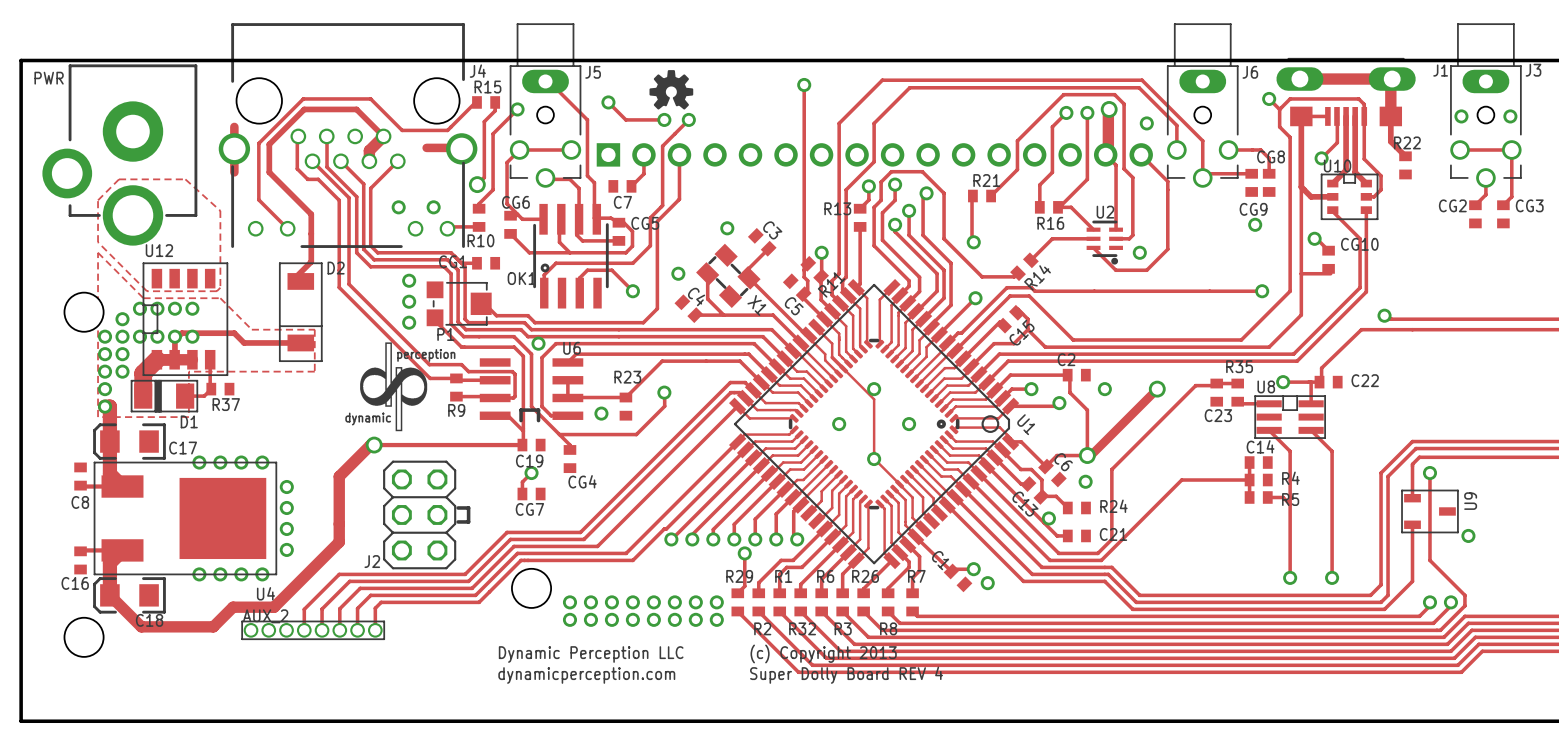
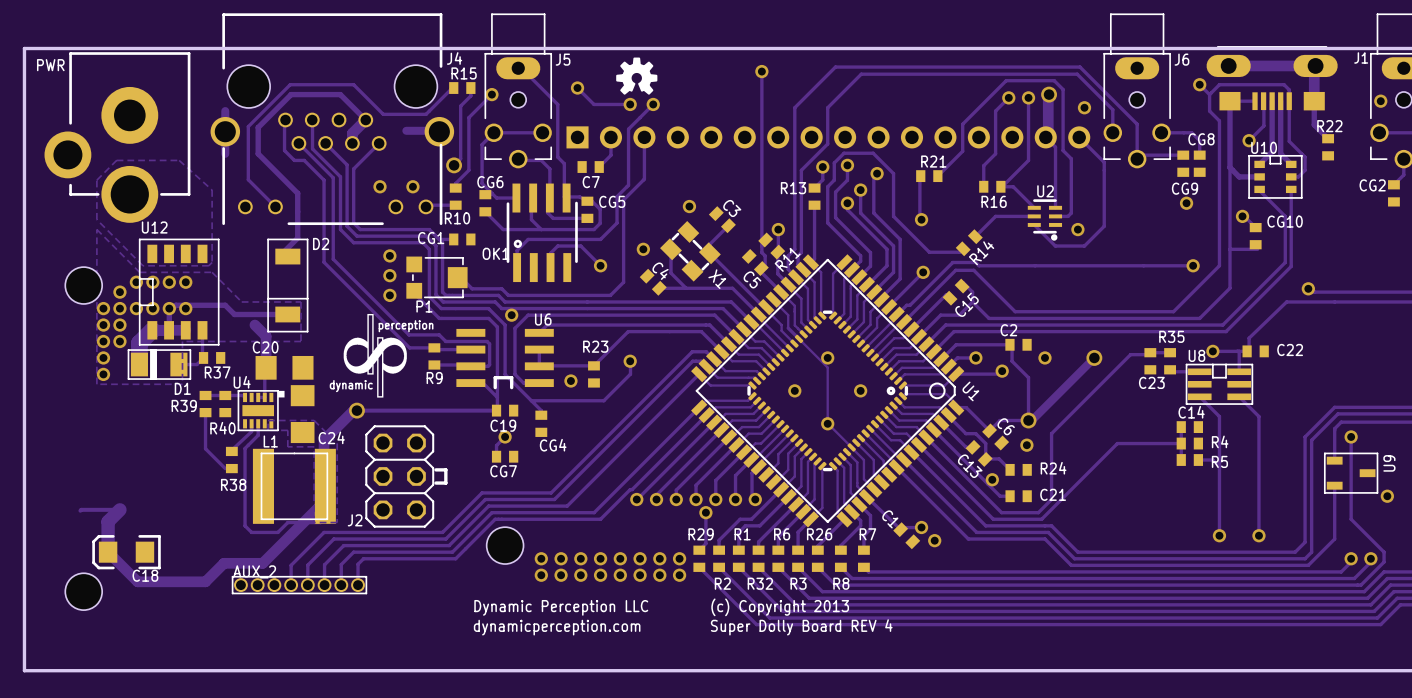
track: none -> (254, 325) (266, 336) (264, 397) (258, 397)
C20: none -> (284, 367)
track: (105, 406) (109, 406) (109, 473) (122, 486) (80, 485) -> none
track: none -> (205, 395) (243, 395) (245, 397)
R39: none -> (205, 404)
R40: none -> (225, 404)
C17: (129, 441) -> none
track: none -> (205, 412) (205, 448) (225, 468) (231, 468) (230, 469)
C24: none -> (302, 414)
zone outline: none -> (268, 420) (314, 420) (337, 443) (337, 522) (314, 522) (314, 446) (287, 446) (287, 430) (268, 430) (268, 420)
track: none -> (251, 423) (251, 431) (231, 451)
track: none -> (258, 423) (258, 435) (245, 448) (245, 525) (251, 532) (277, 532) (287, 522) (320, 522) (324, 519)
U4 footprint: [93, 461, 278, 576] -> [237, 390, 285, 432]
via: (199, 462) -> none
via: (220, 462) -> none
via: (241, 462) -> none
via: (262, 462) -> none
C8: (80, 476) -> none
via: (286, 487) -> none
R38: none -> (231, 460)
via: (286, 507) -> none
L1: none -> (294, 486)
via: (286, 528) -> none
via: (286, 549) -> none
C16: (80, 560) -> none
via: (199, 574) -> none
via: (220, 574) -> none
via: (241, 574) -> none
via: (262, 574) -> none
U4 name position: U4 (265, 593) -> U4 (242, 382)

